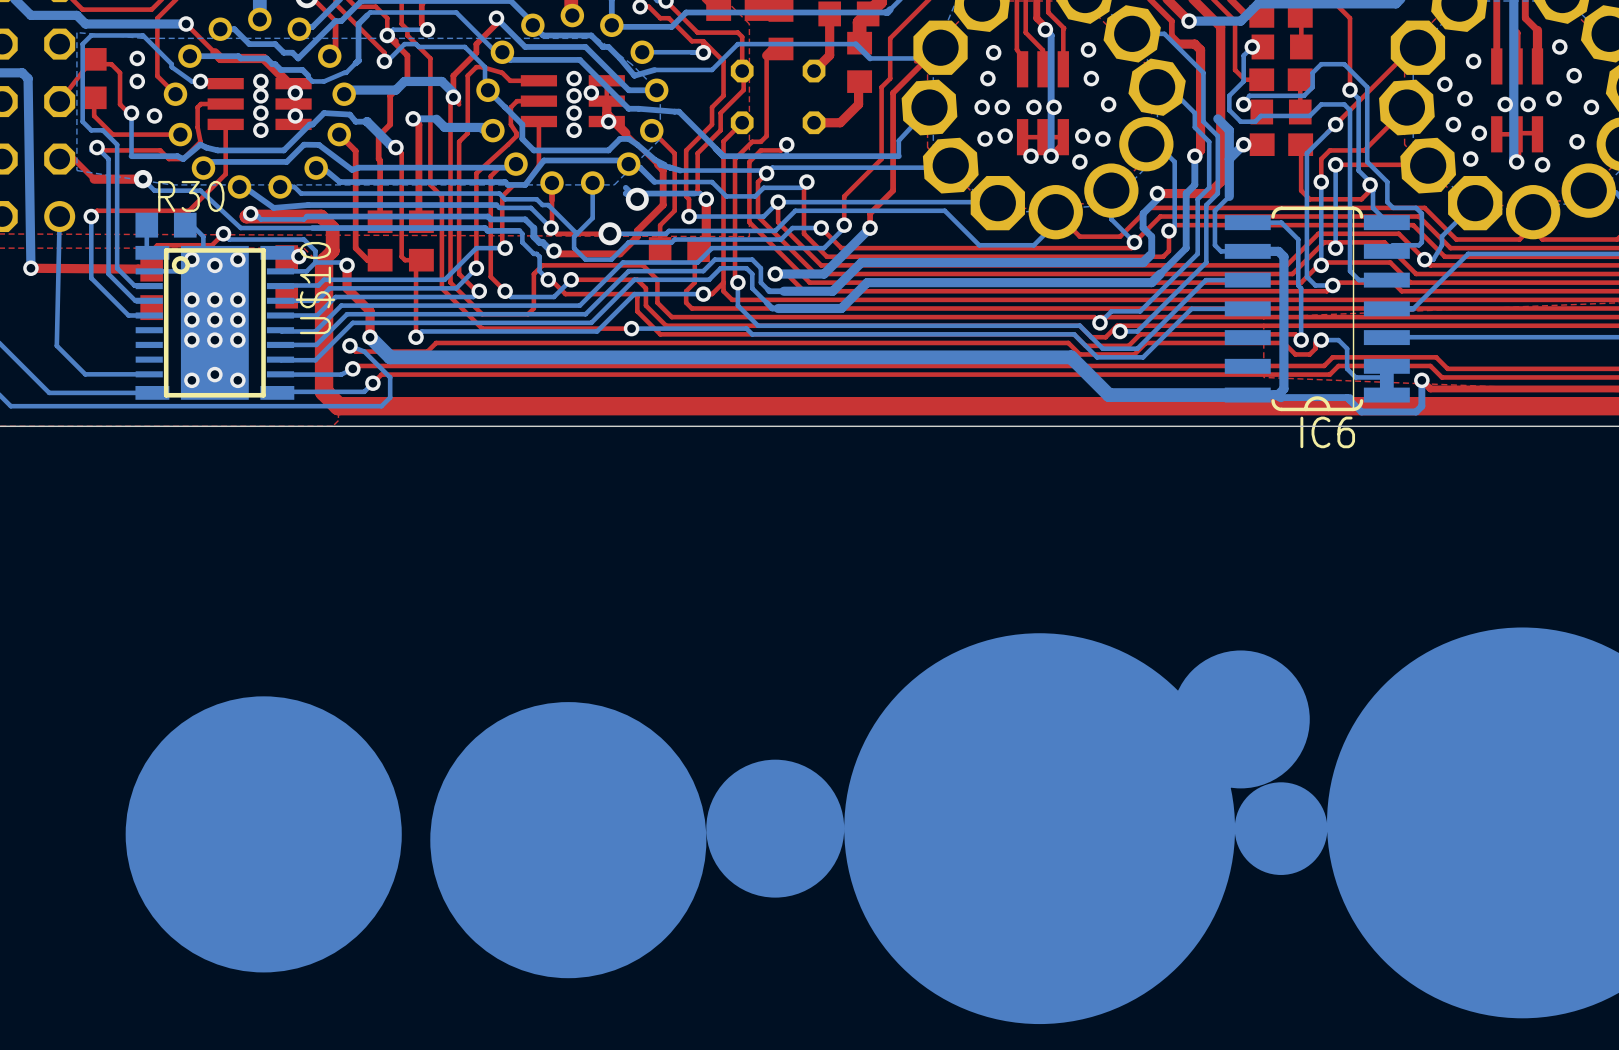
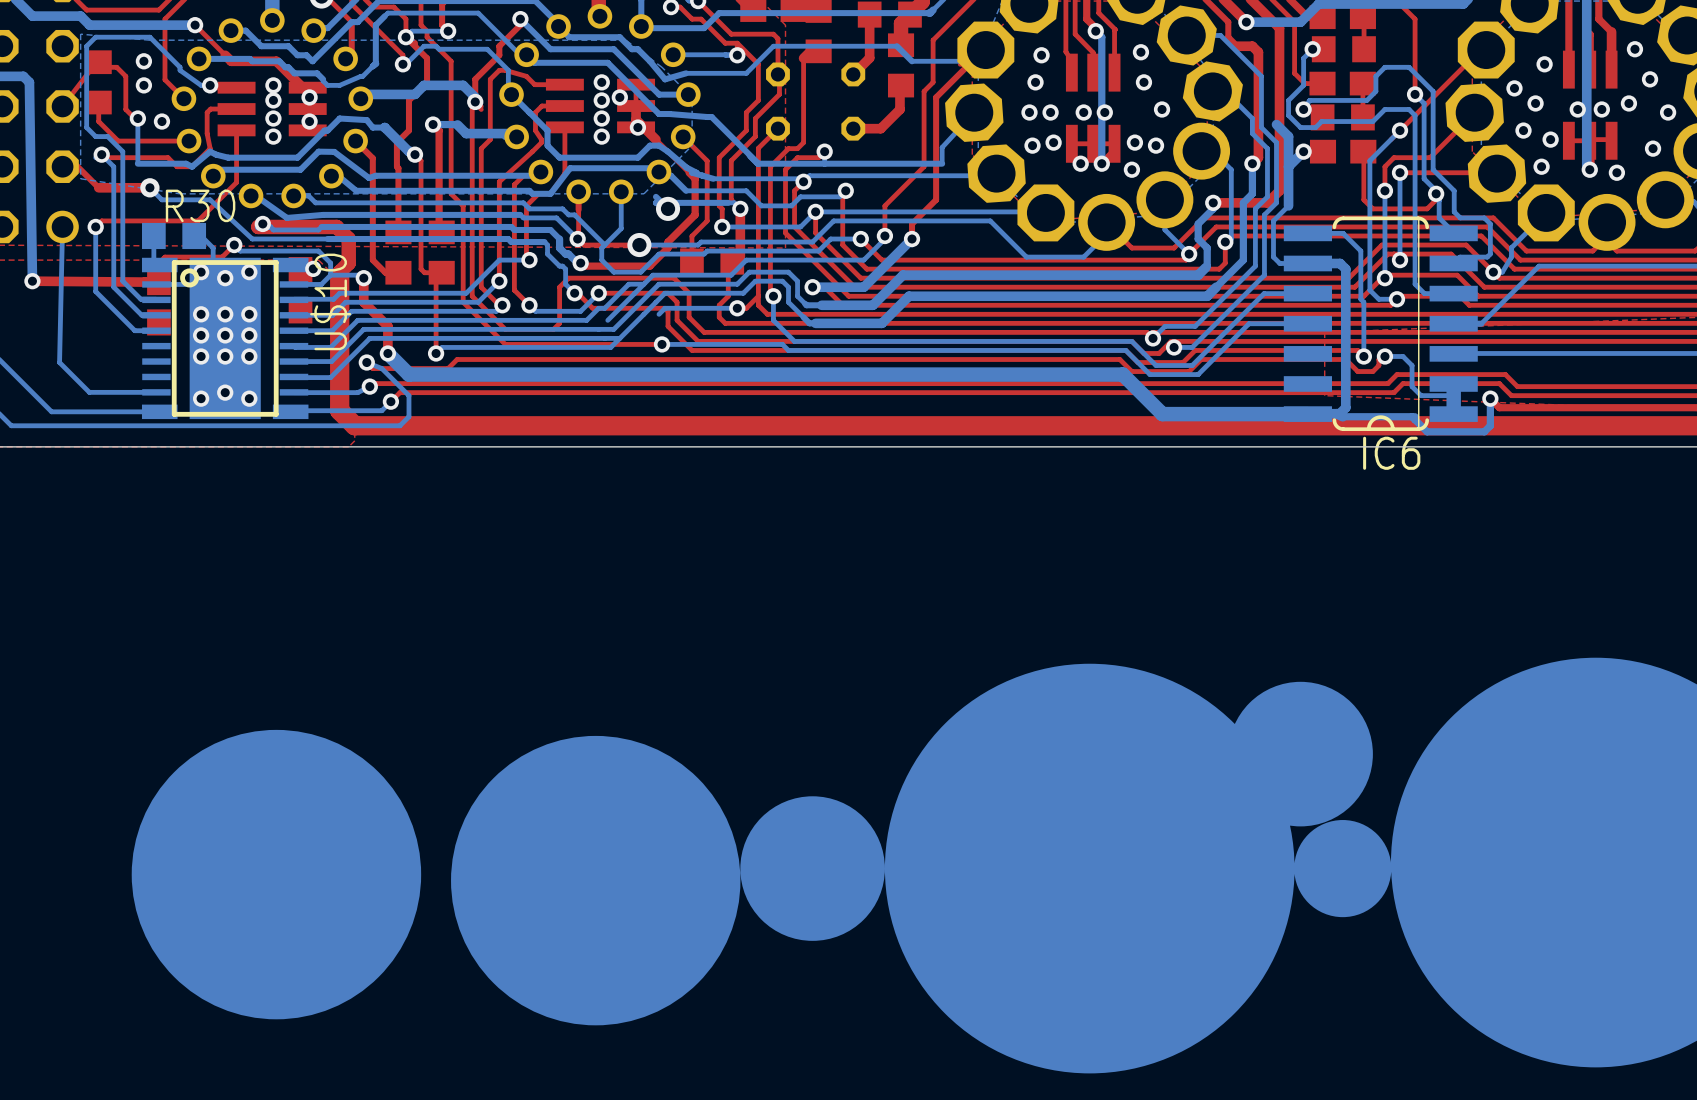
bottom track: (628, 299) (597, 331) (582, 331) -> (619, 338) (610, 347)
bottom track: (579, 305) (559, 305) -> (643, 284) (628, 284) (604, 308) (598, 308) (586, 320)

